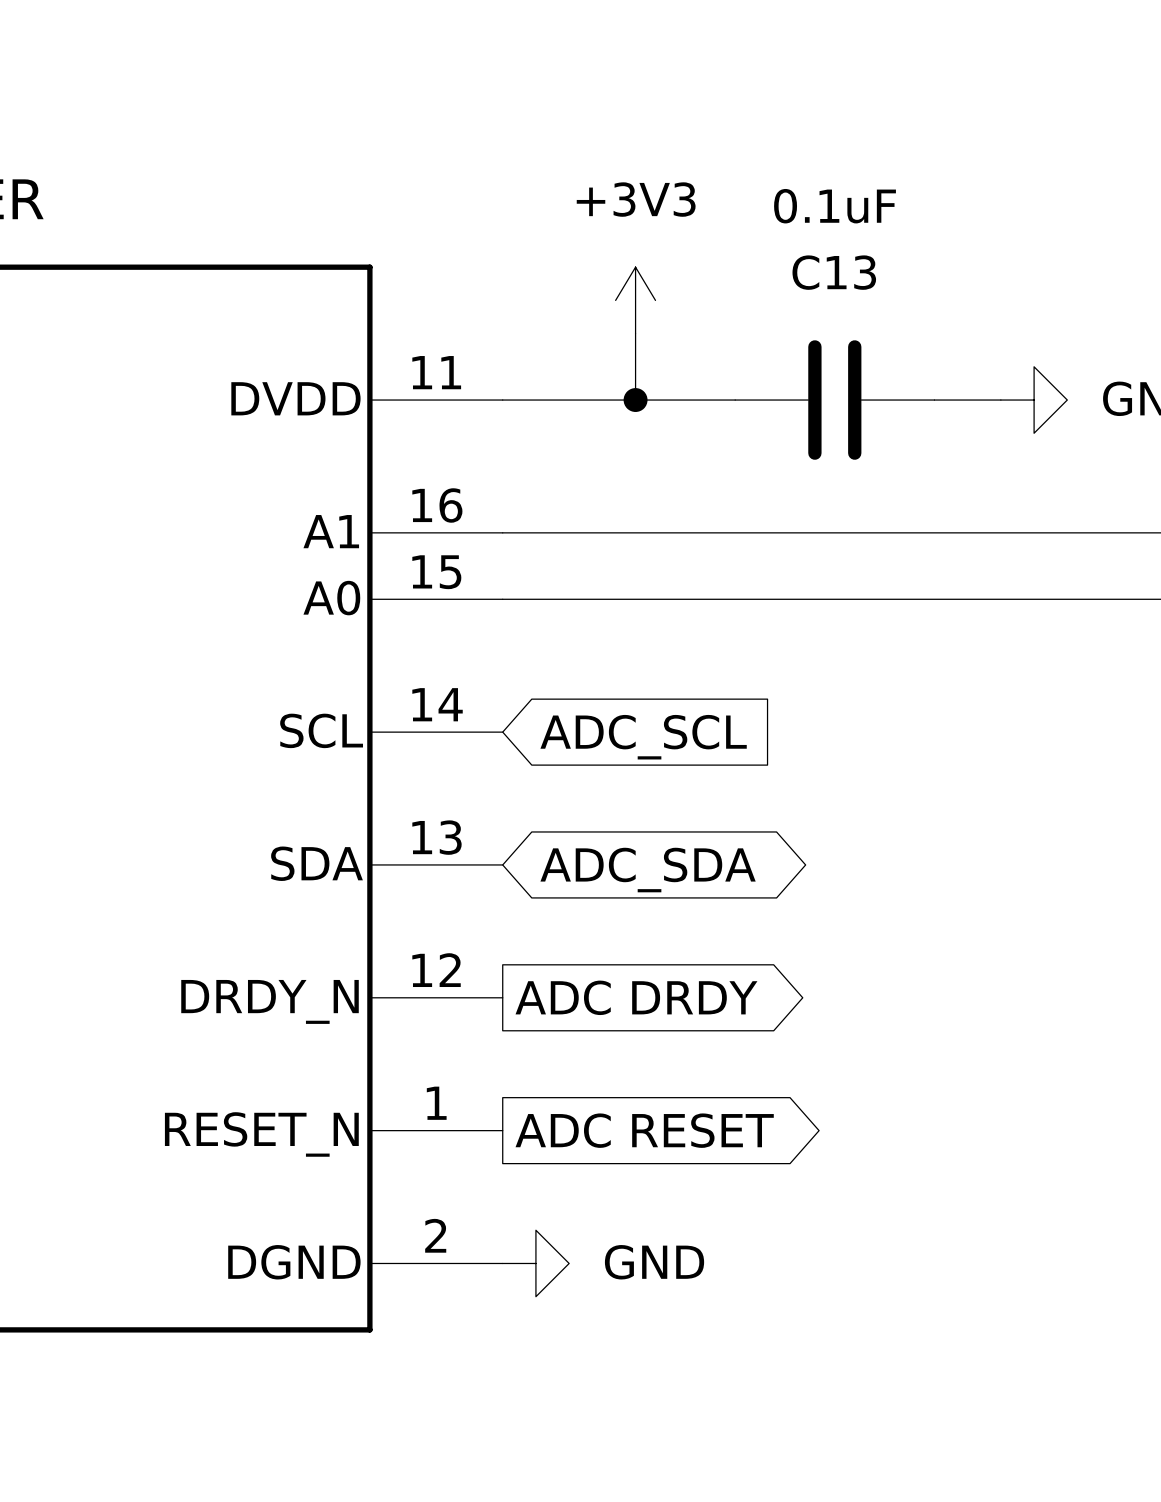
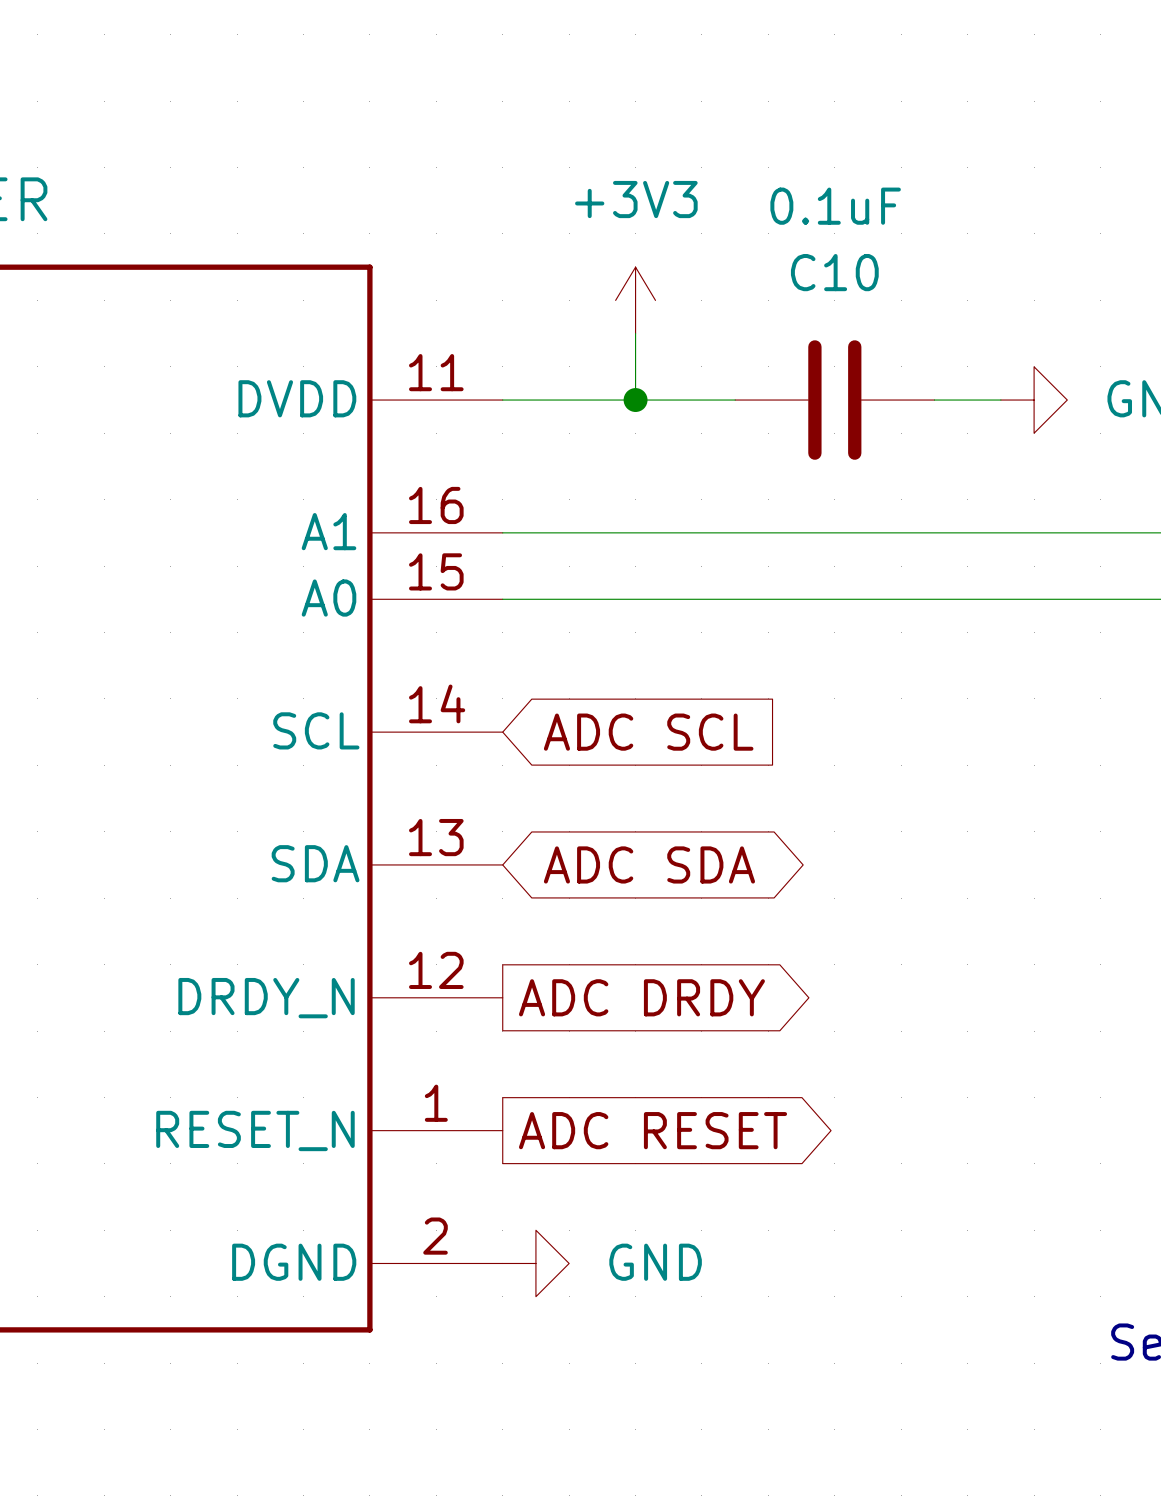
C13 name: C13 (834, 272) -> C10 (834, 272)
global label: ADC_SCL (643, 737) -> ADC SCL (648, 732)
global label: ADC_SDA (648, 870) -> ADC SDA (649, 864)

